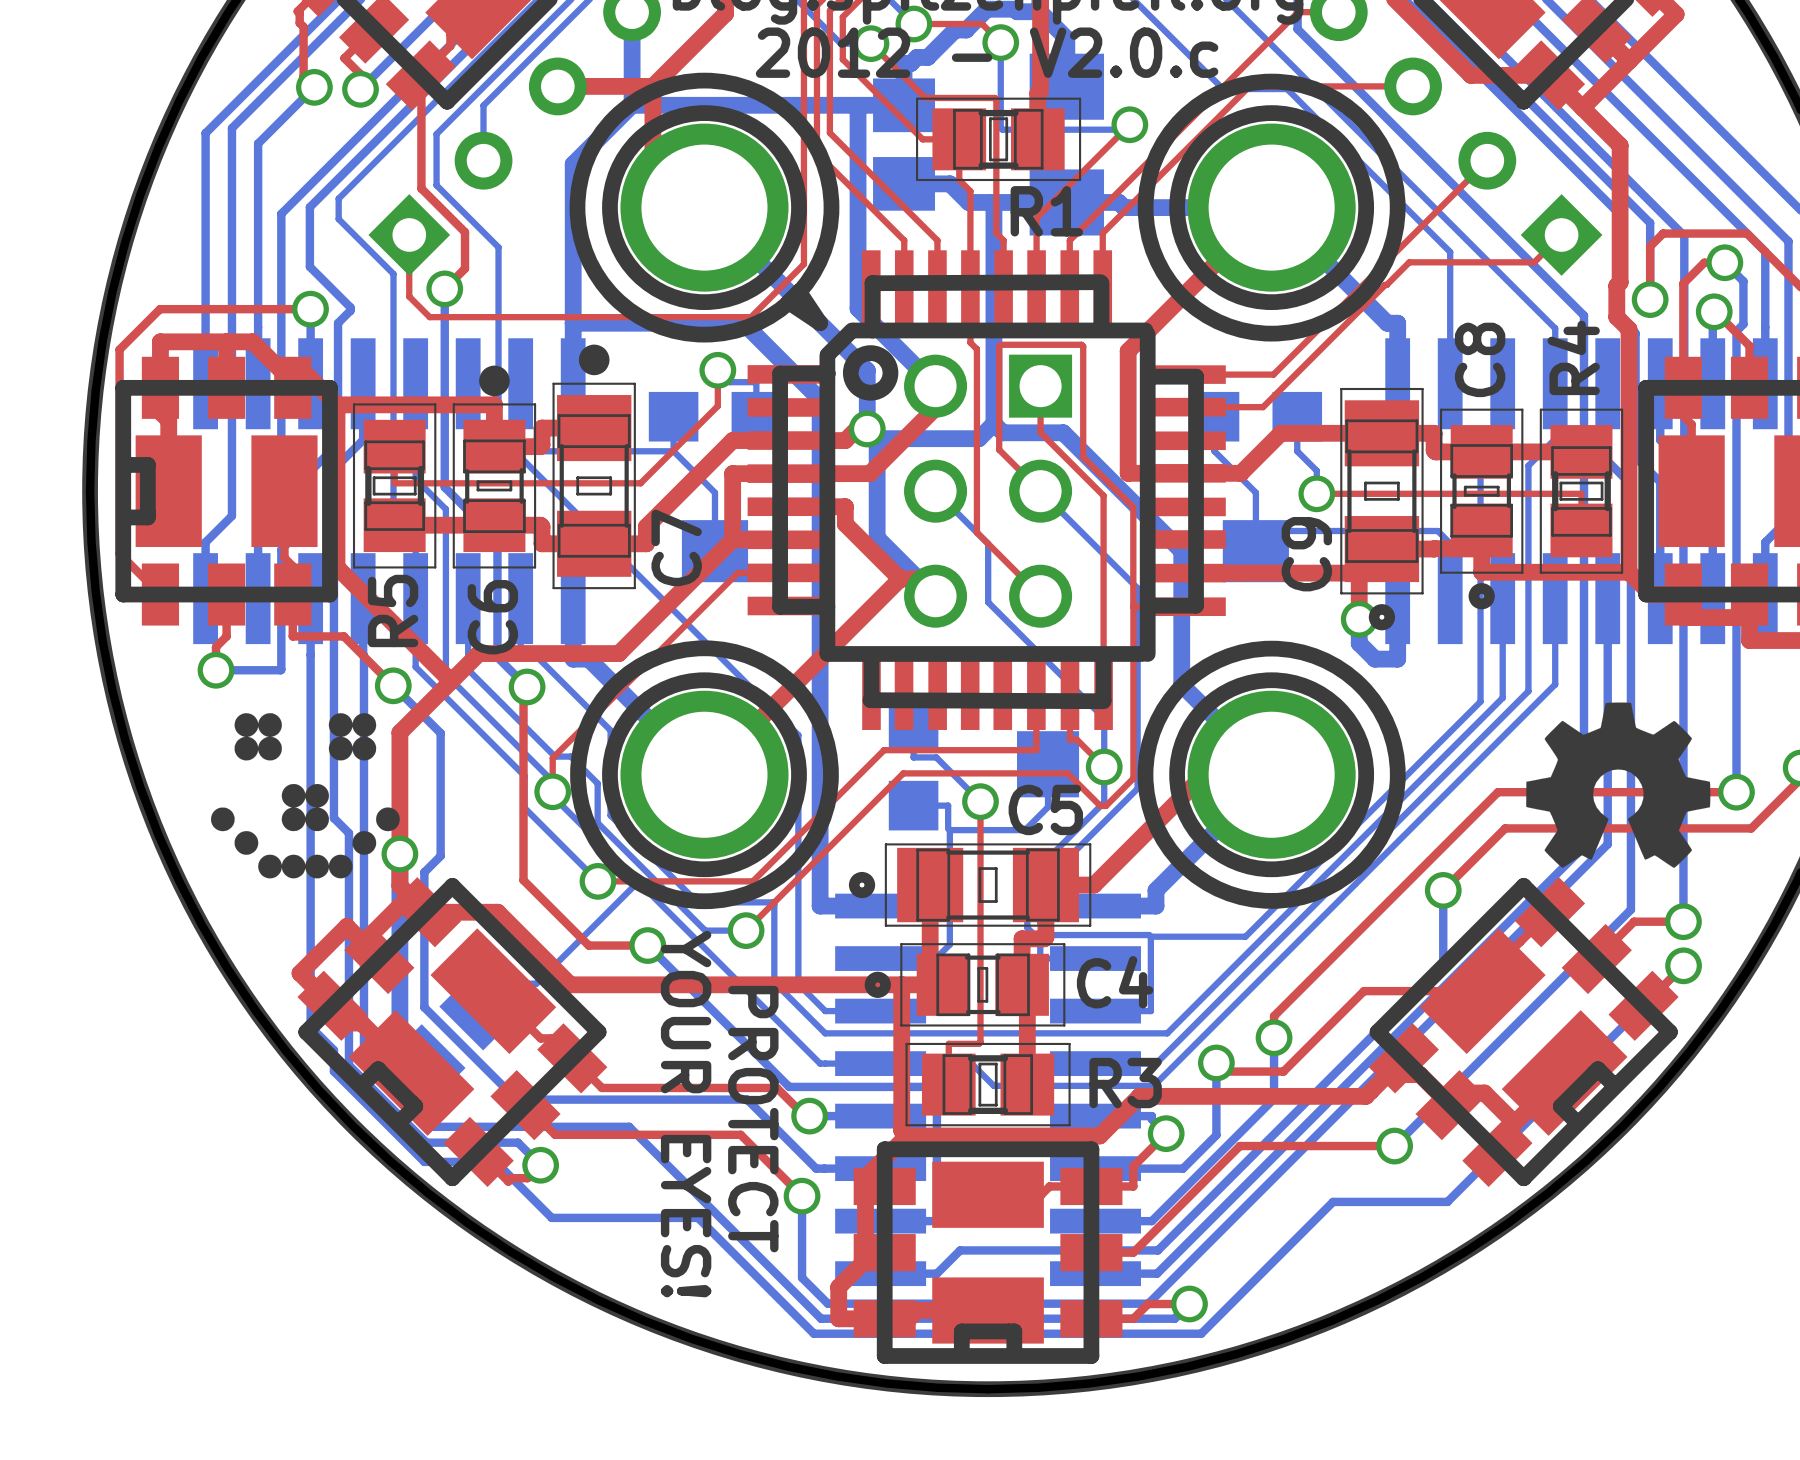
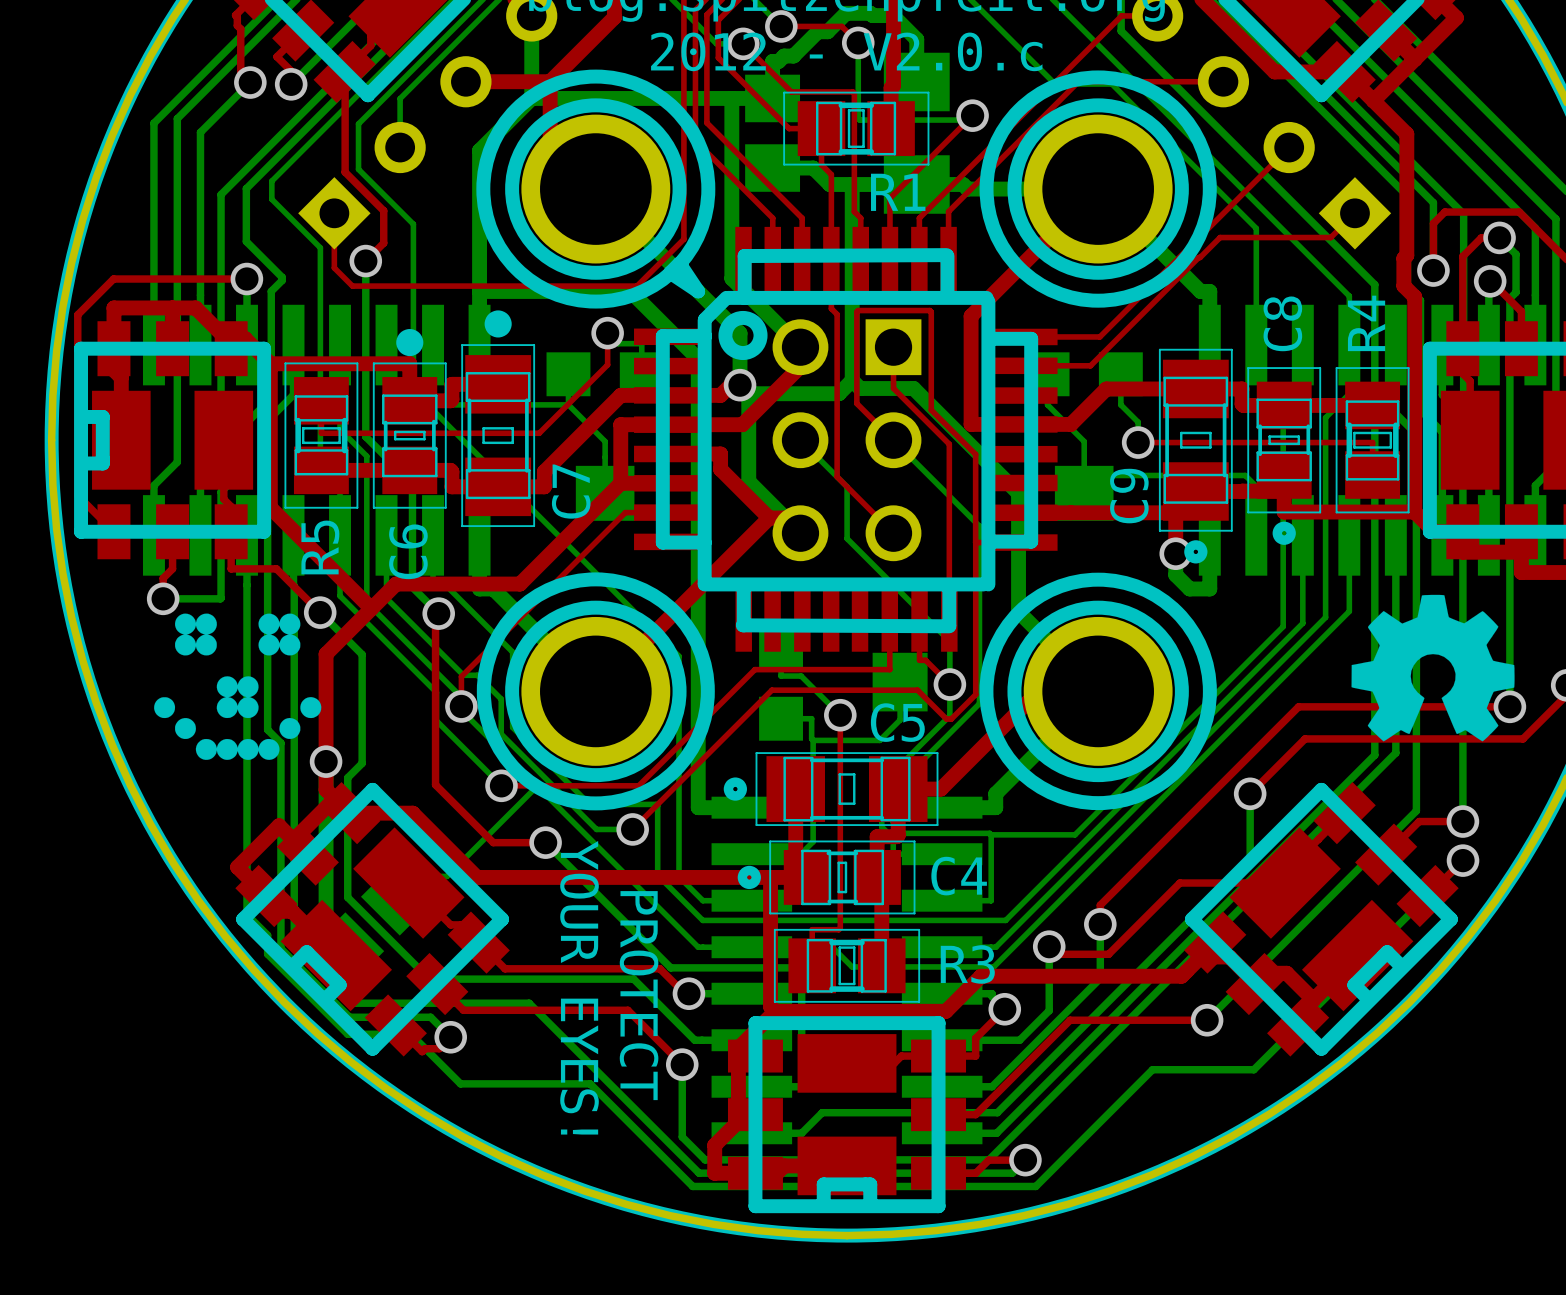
drawing position: (1618, 785) -> (1433, 668)
drawing position: (305, 795) -> (237, 686)

